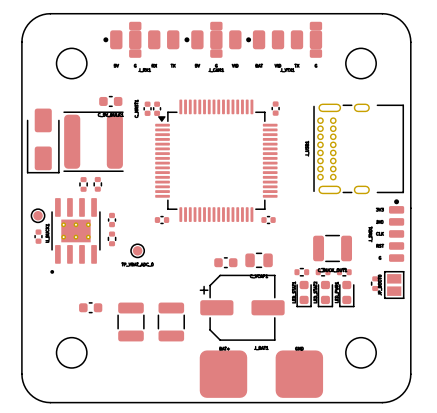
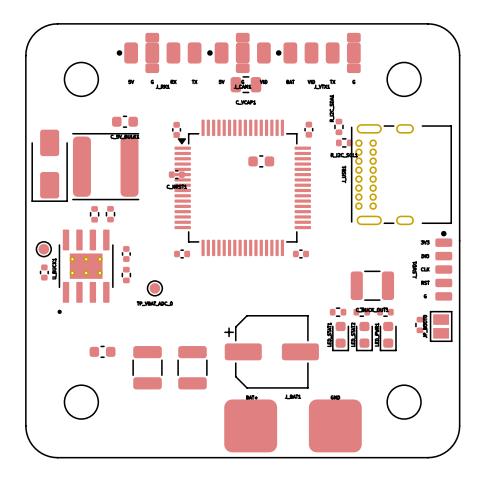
part: none -> (338, 126)
part rotation: 0° (147, 108) -> 90° clockwise (176, 174)
part position: (147, 108) -> (176, 174)
part: none -> (344, 142)
part position: (259, 260) -> (245, 84)
part position: (225, 262) -> (261, 161)

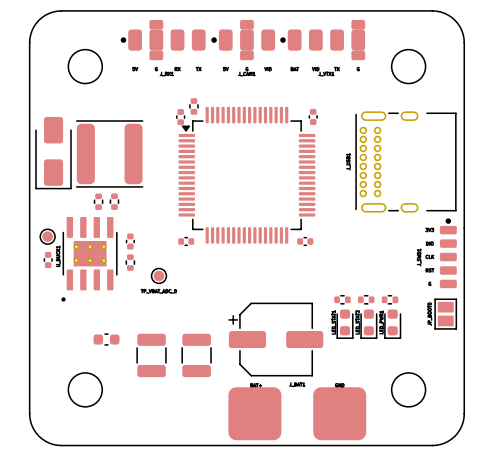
part: (245, 84) -> none
part: none -> (193, 106)
part: (124, 121) -> none
part: (338, 126) -> none
part: (344, 142) -> none
part: (261, 161) -> none
part: (176, 174) -> none
part: (372, 285) -> none
part: (419, 324) -> none

